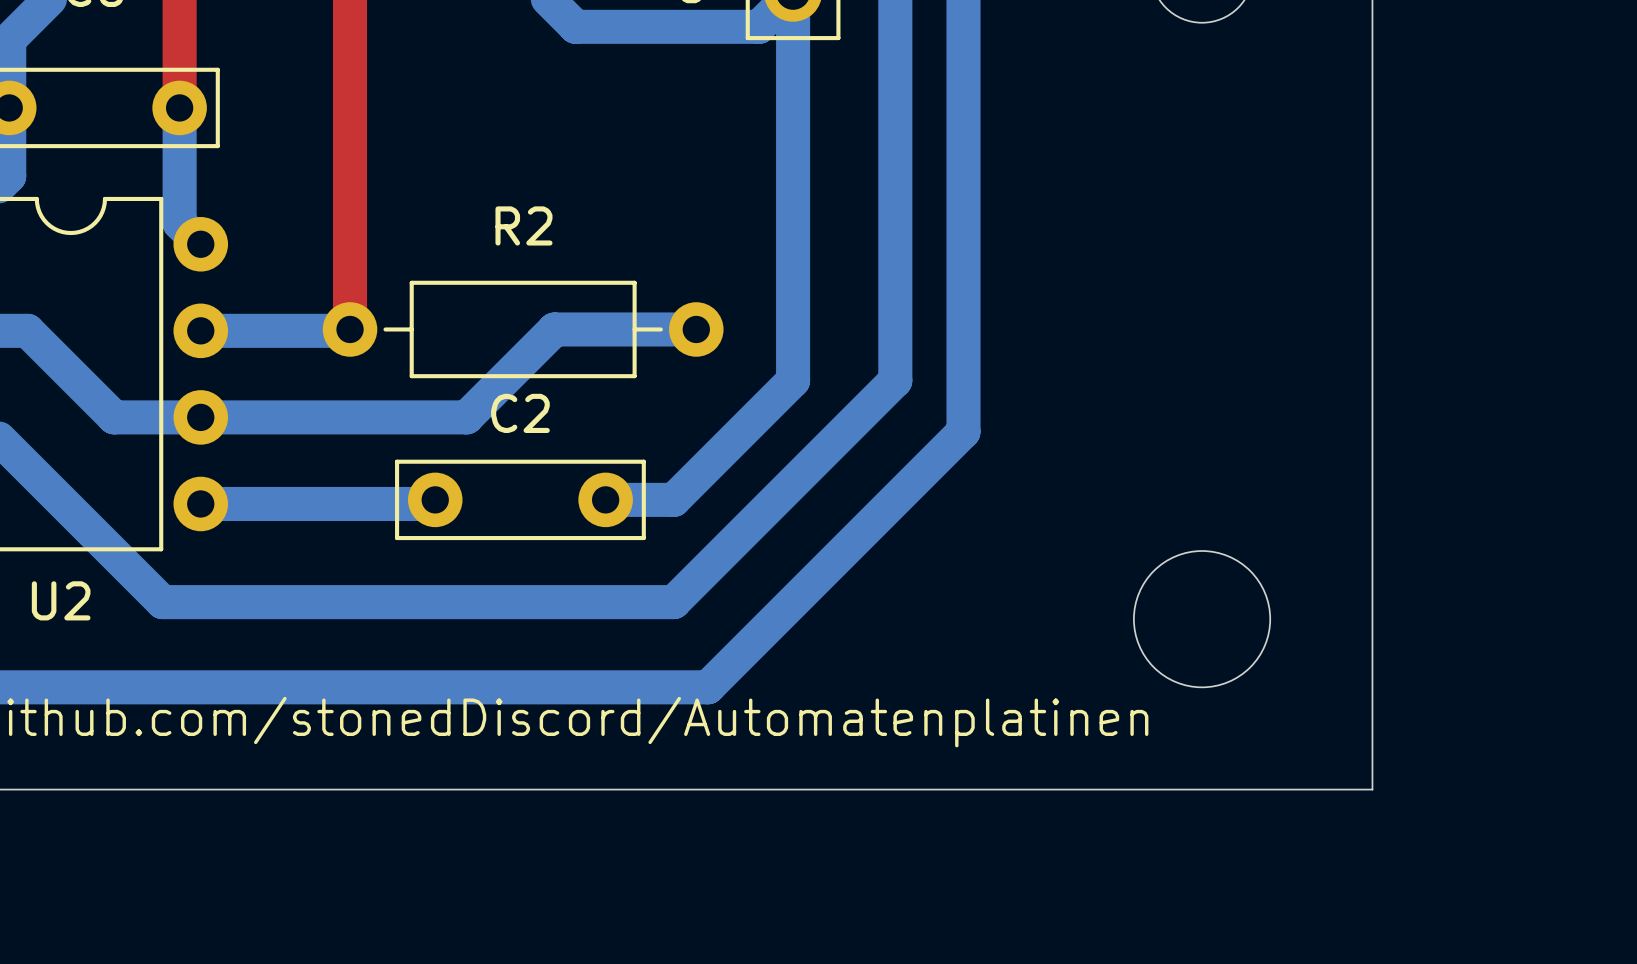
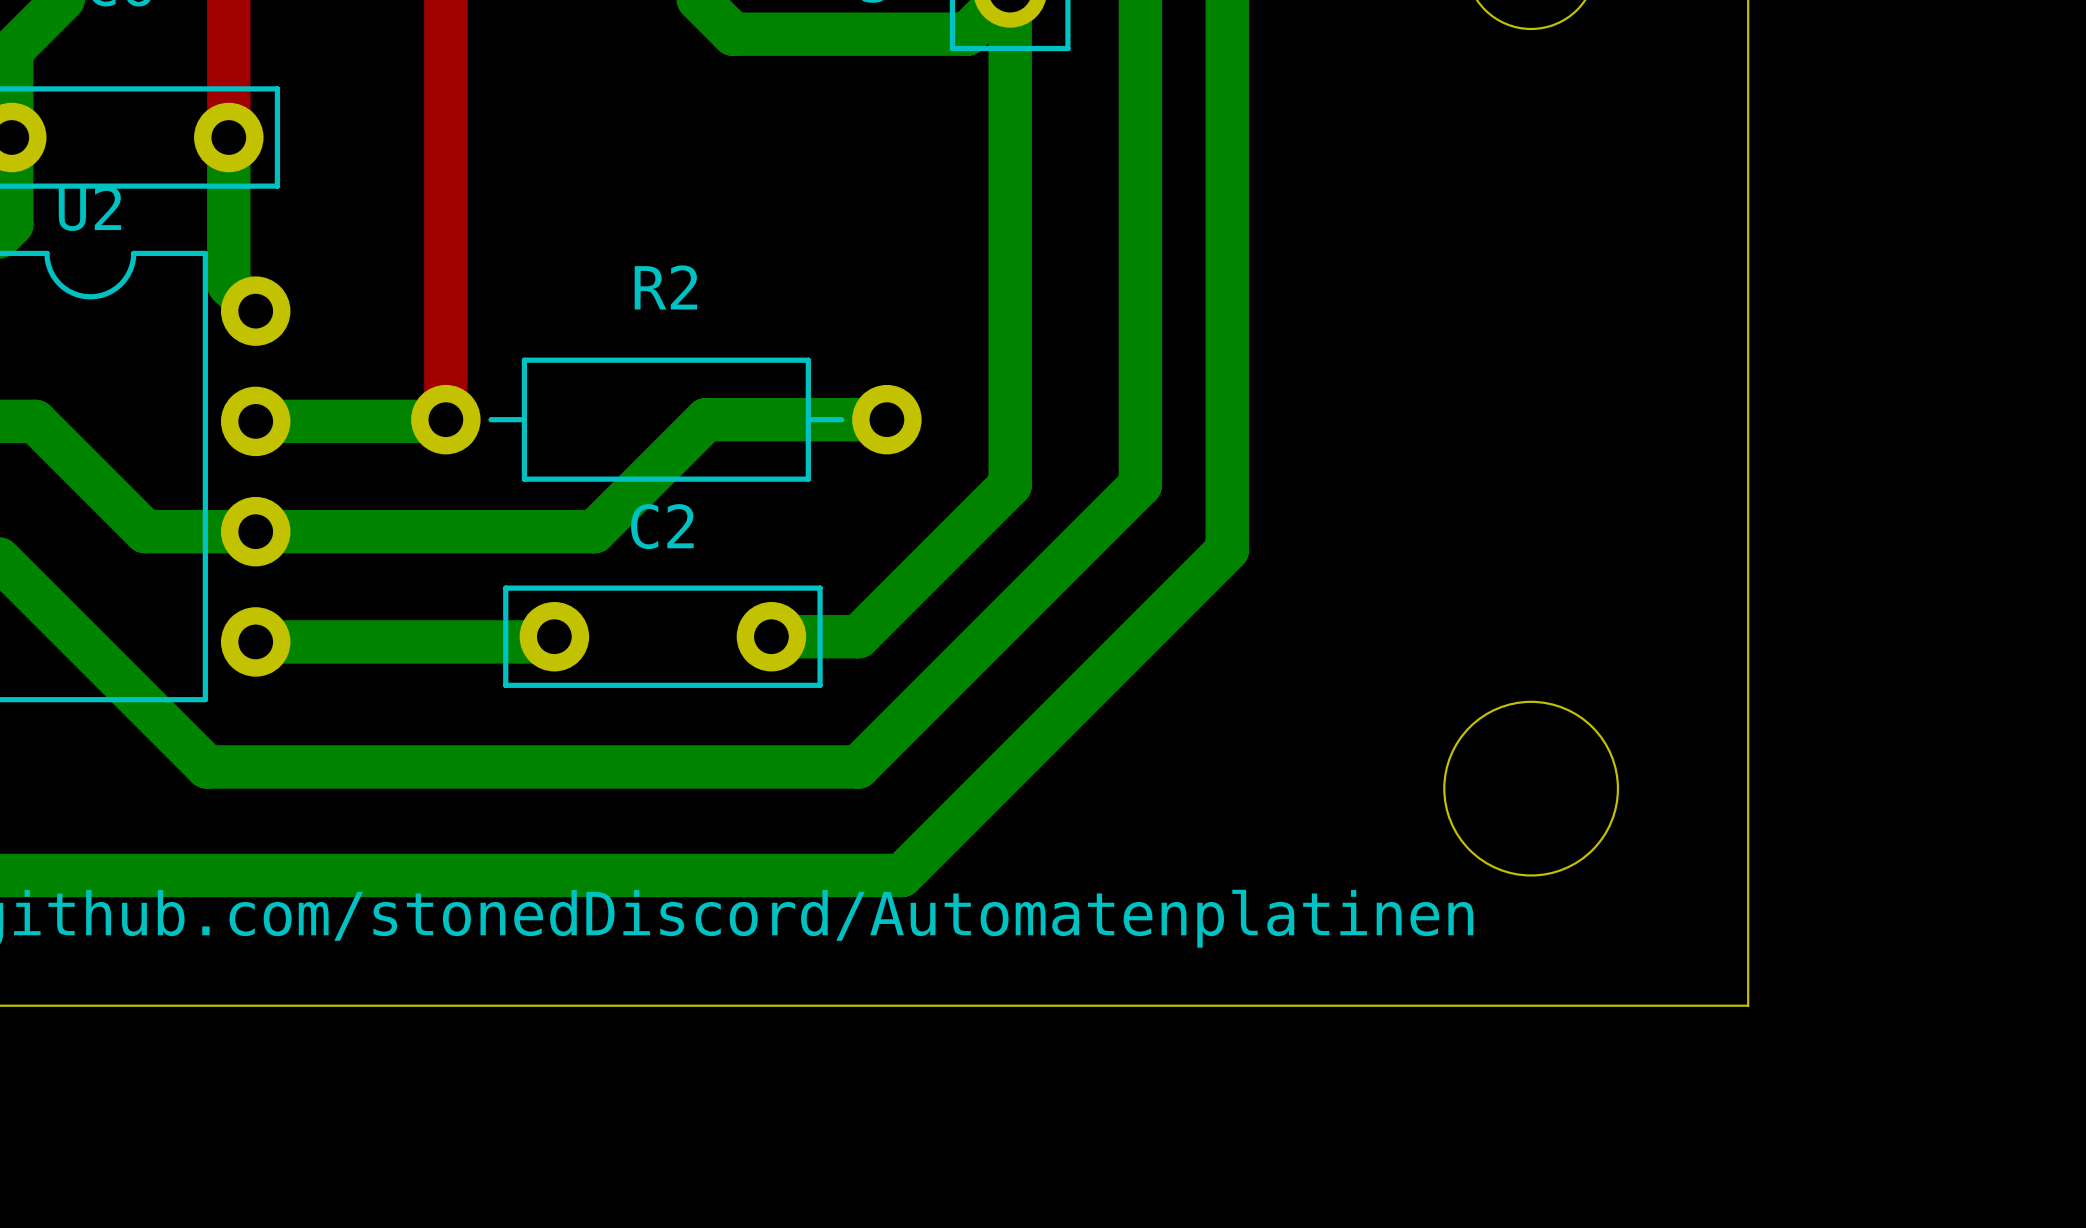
U2 name position: U2 (61, 600) -> U2 (89, 208)

